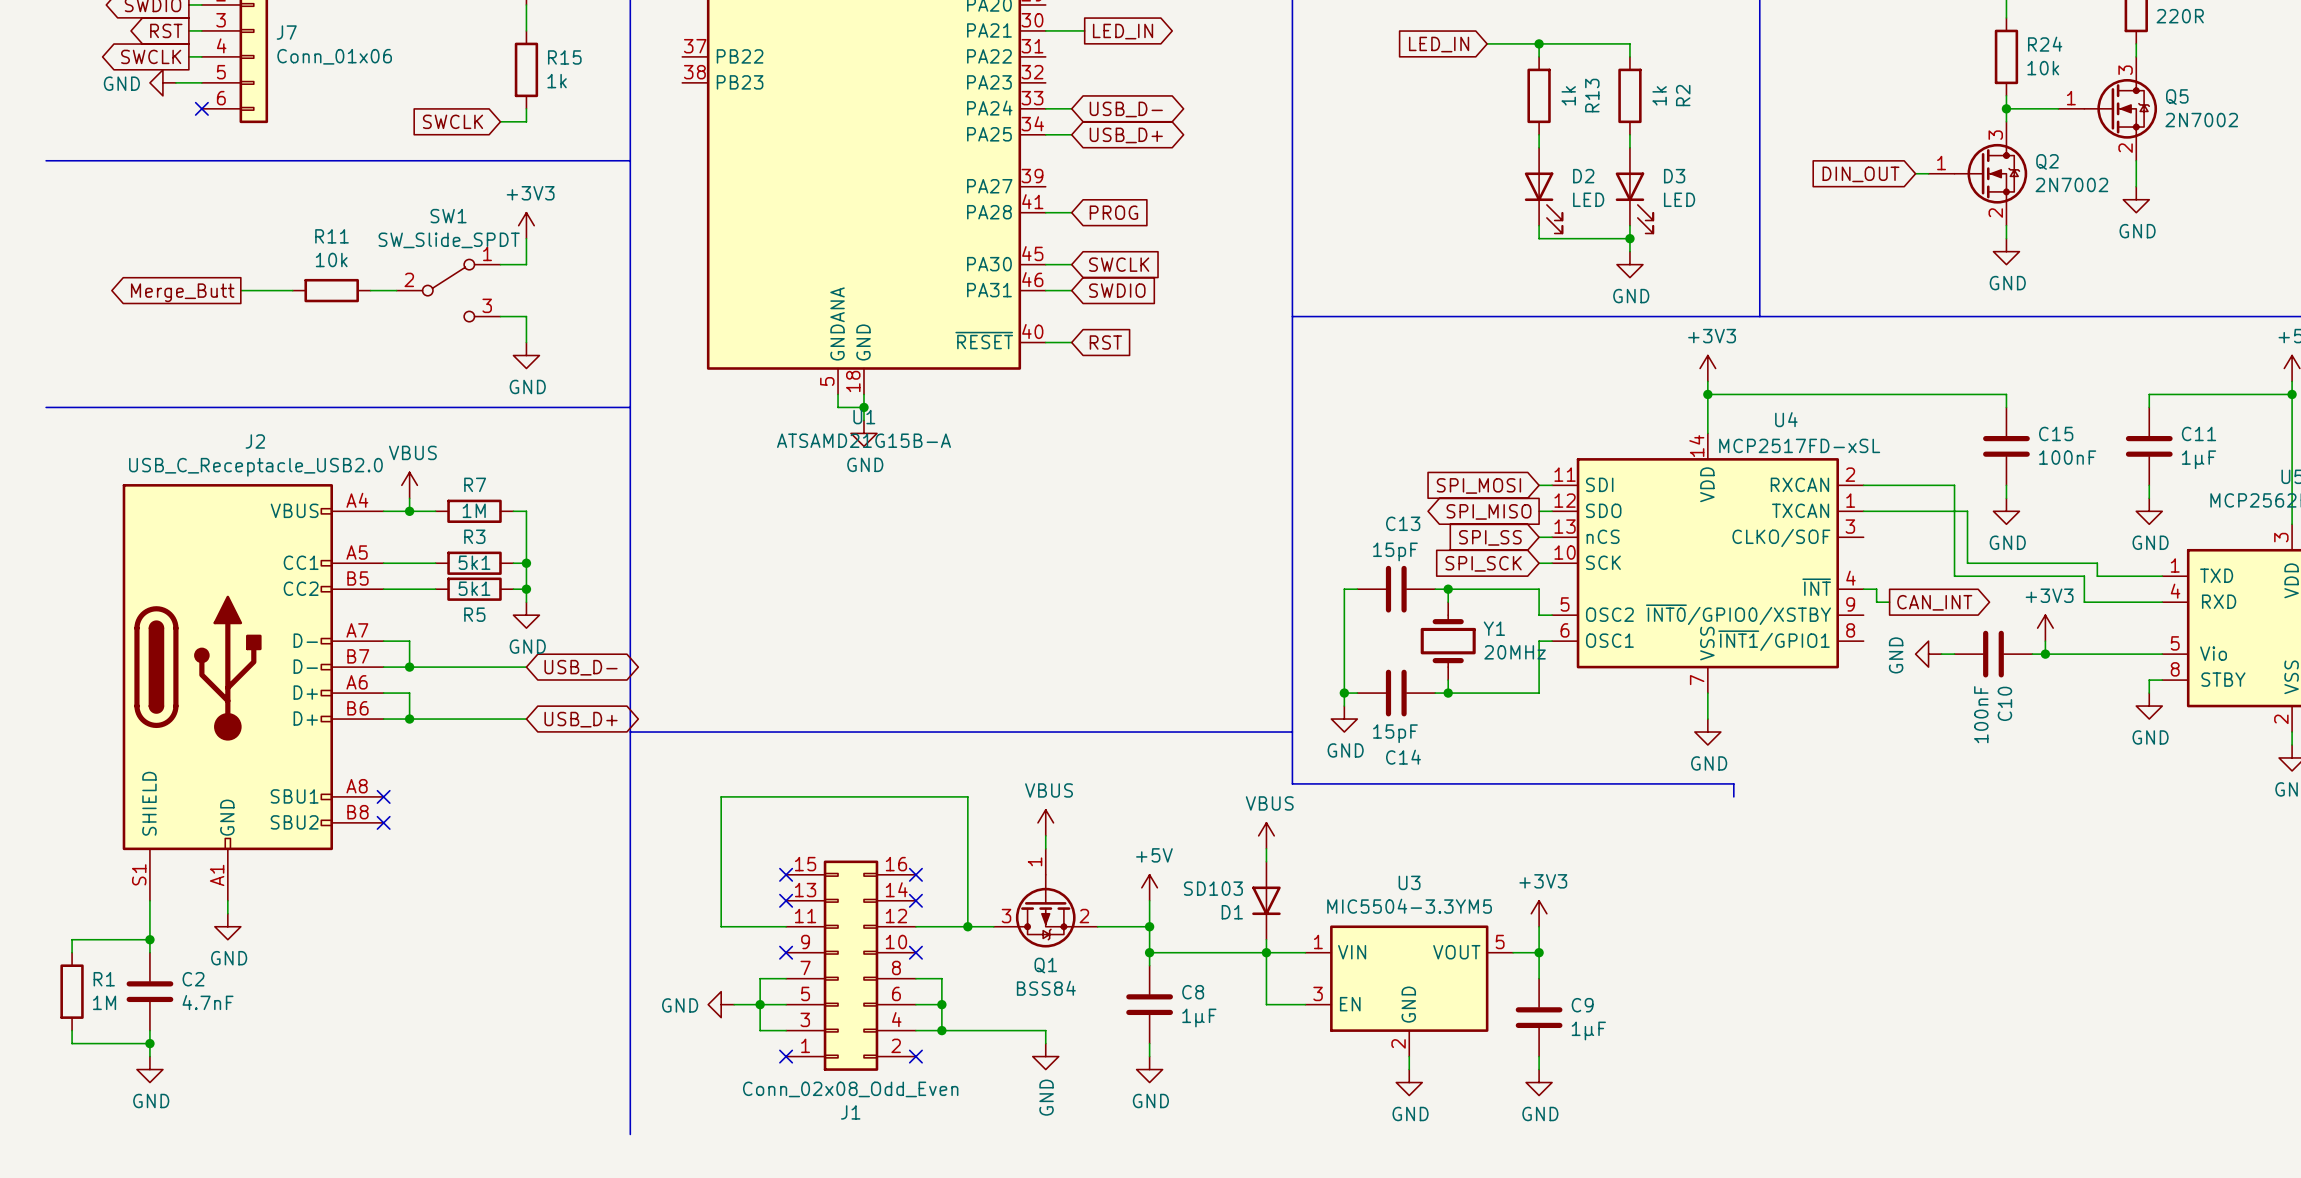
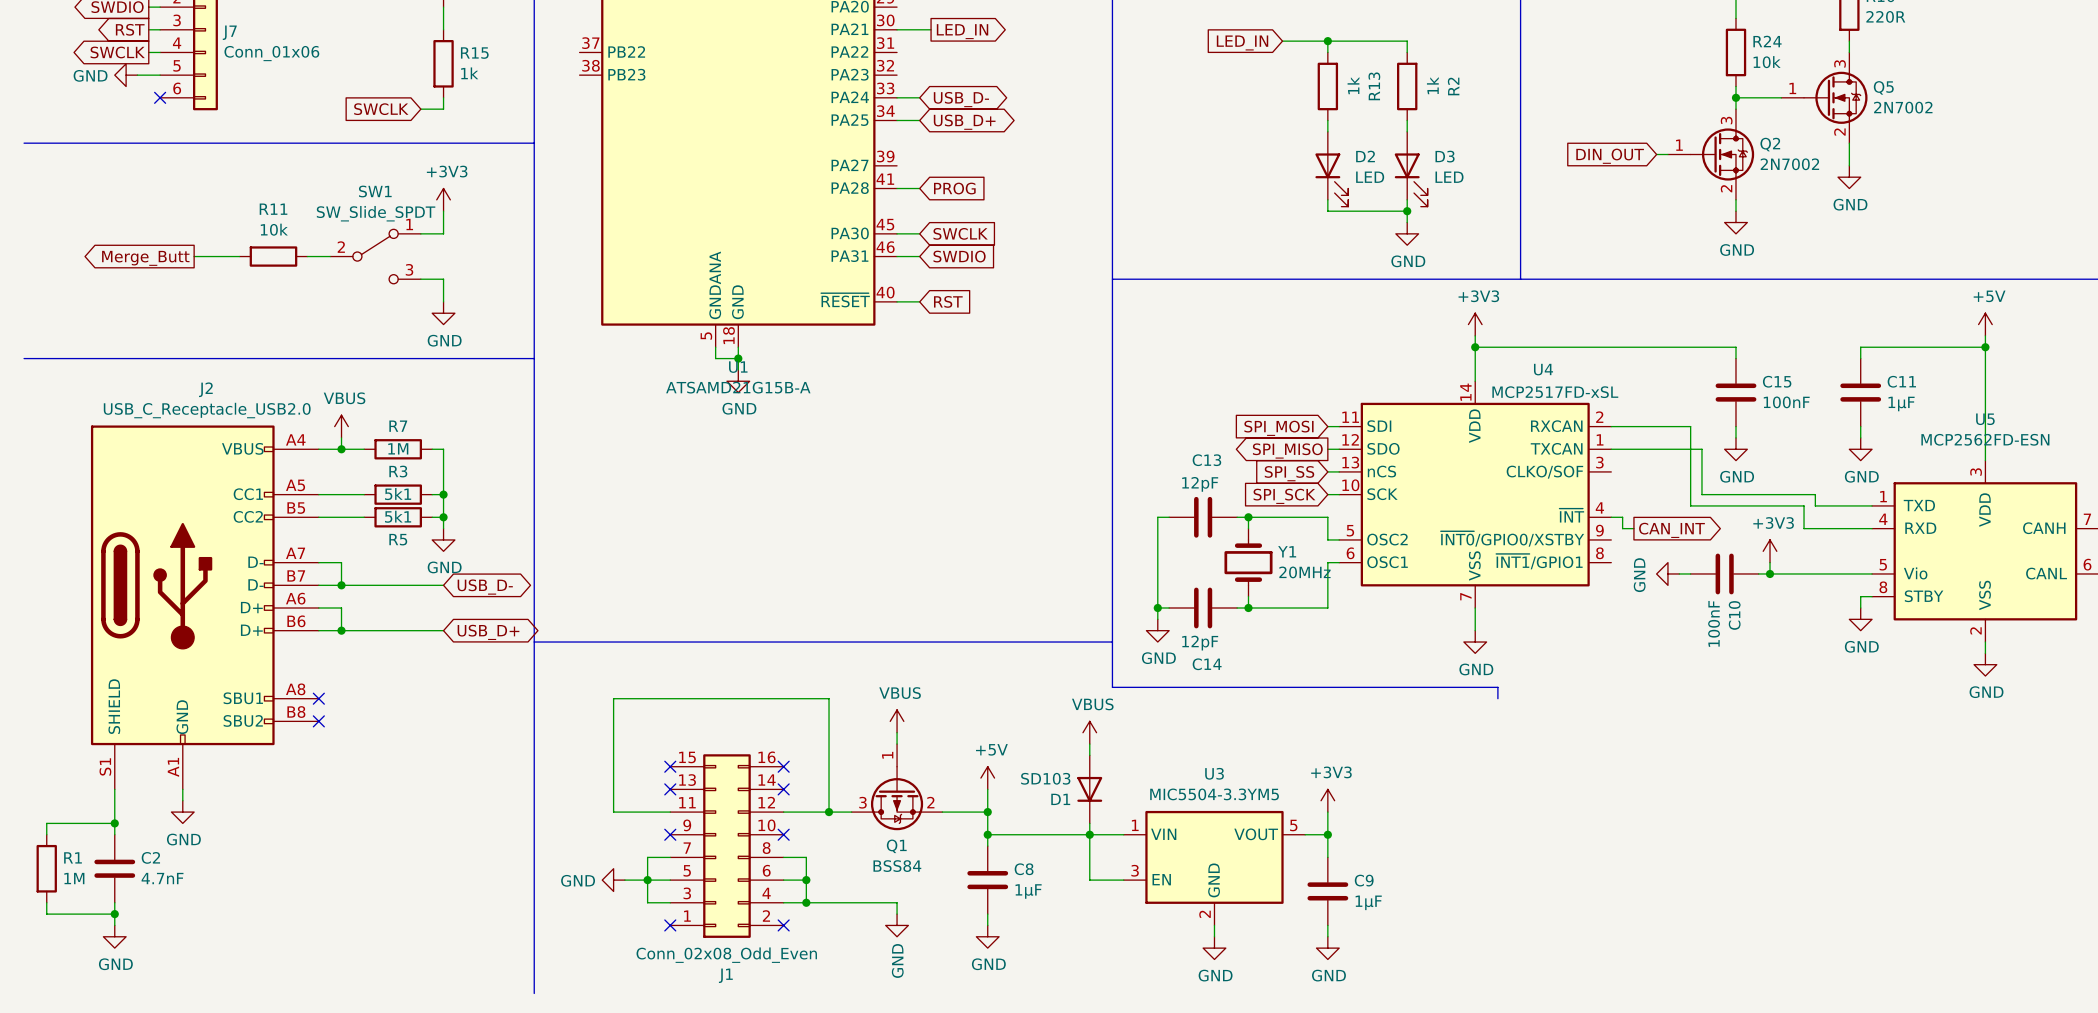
C13 value: 15pF (1395, 551) -> 12pF (1200, 484)
C14 value: 15pF (1395, 733) -> 12pF (1200, 643)

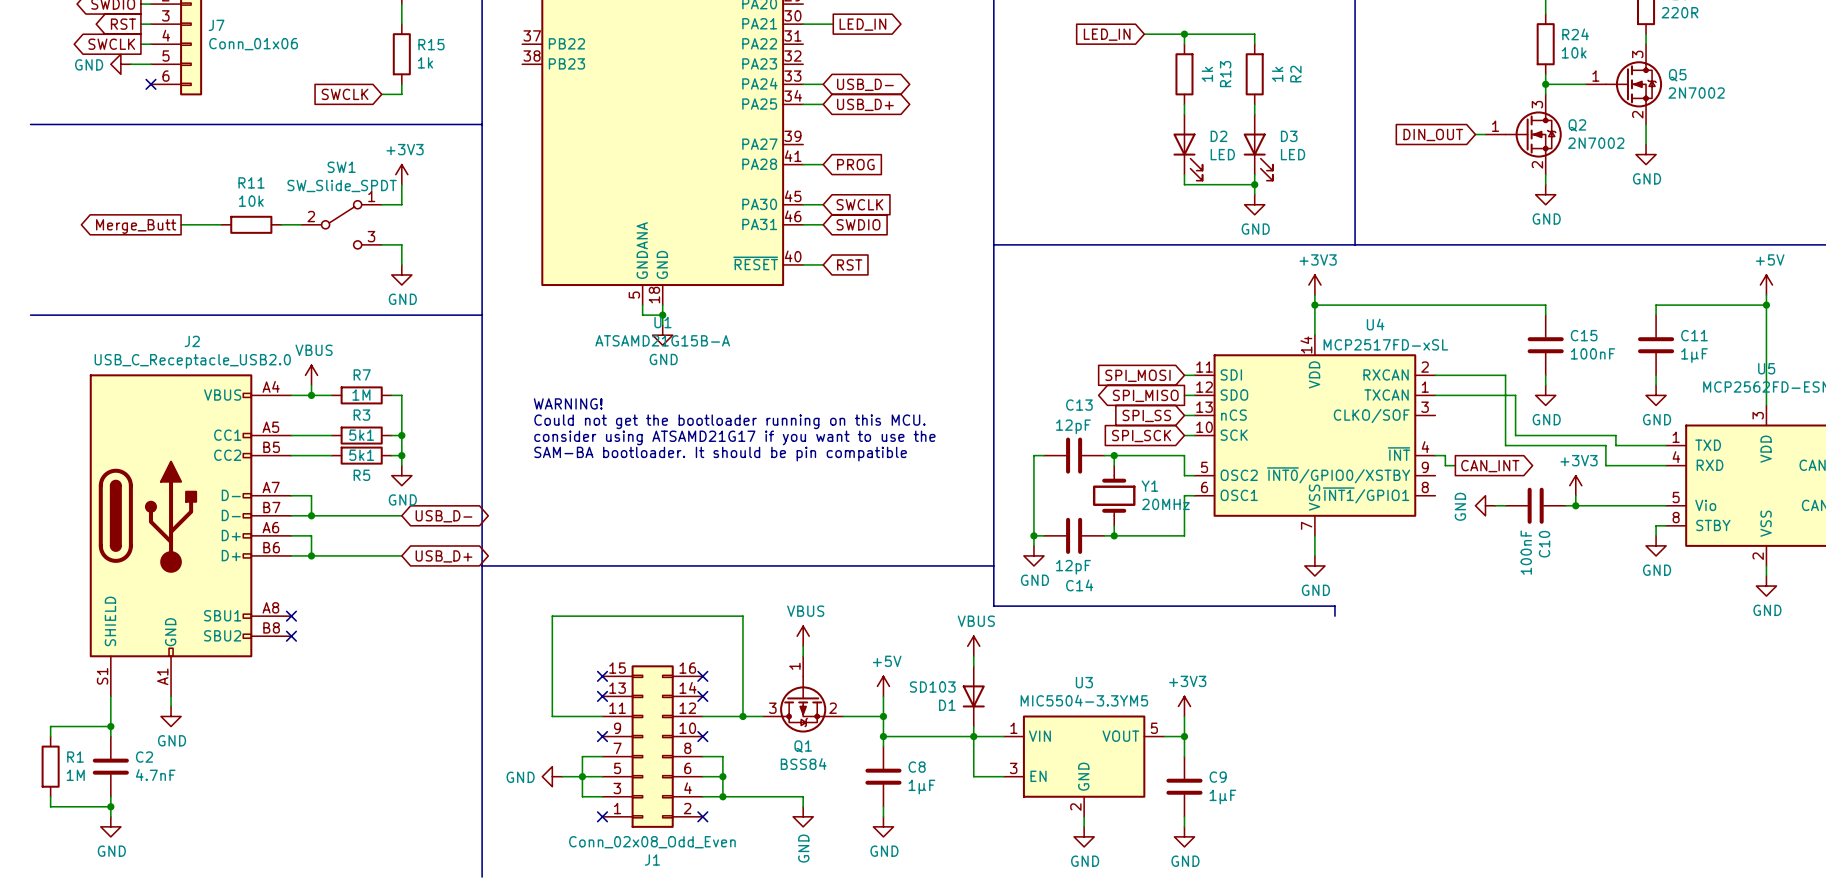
text: none -> WARNING! (568, 403)
text: none -> Could not get the bootloader running on this MCU. (729, 421)
text: none -> consider using ATSAMD21G17 if you want to use the (734, 437)
text: none -> SAM-BA bootloader. It should be pin compatible (720, 454)

